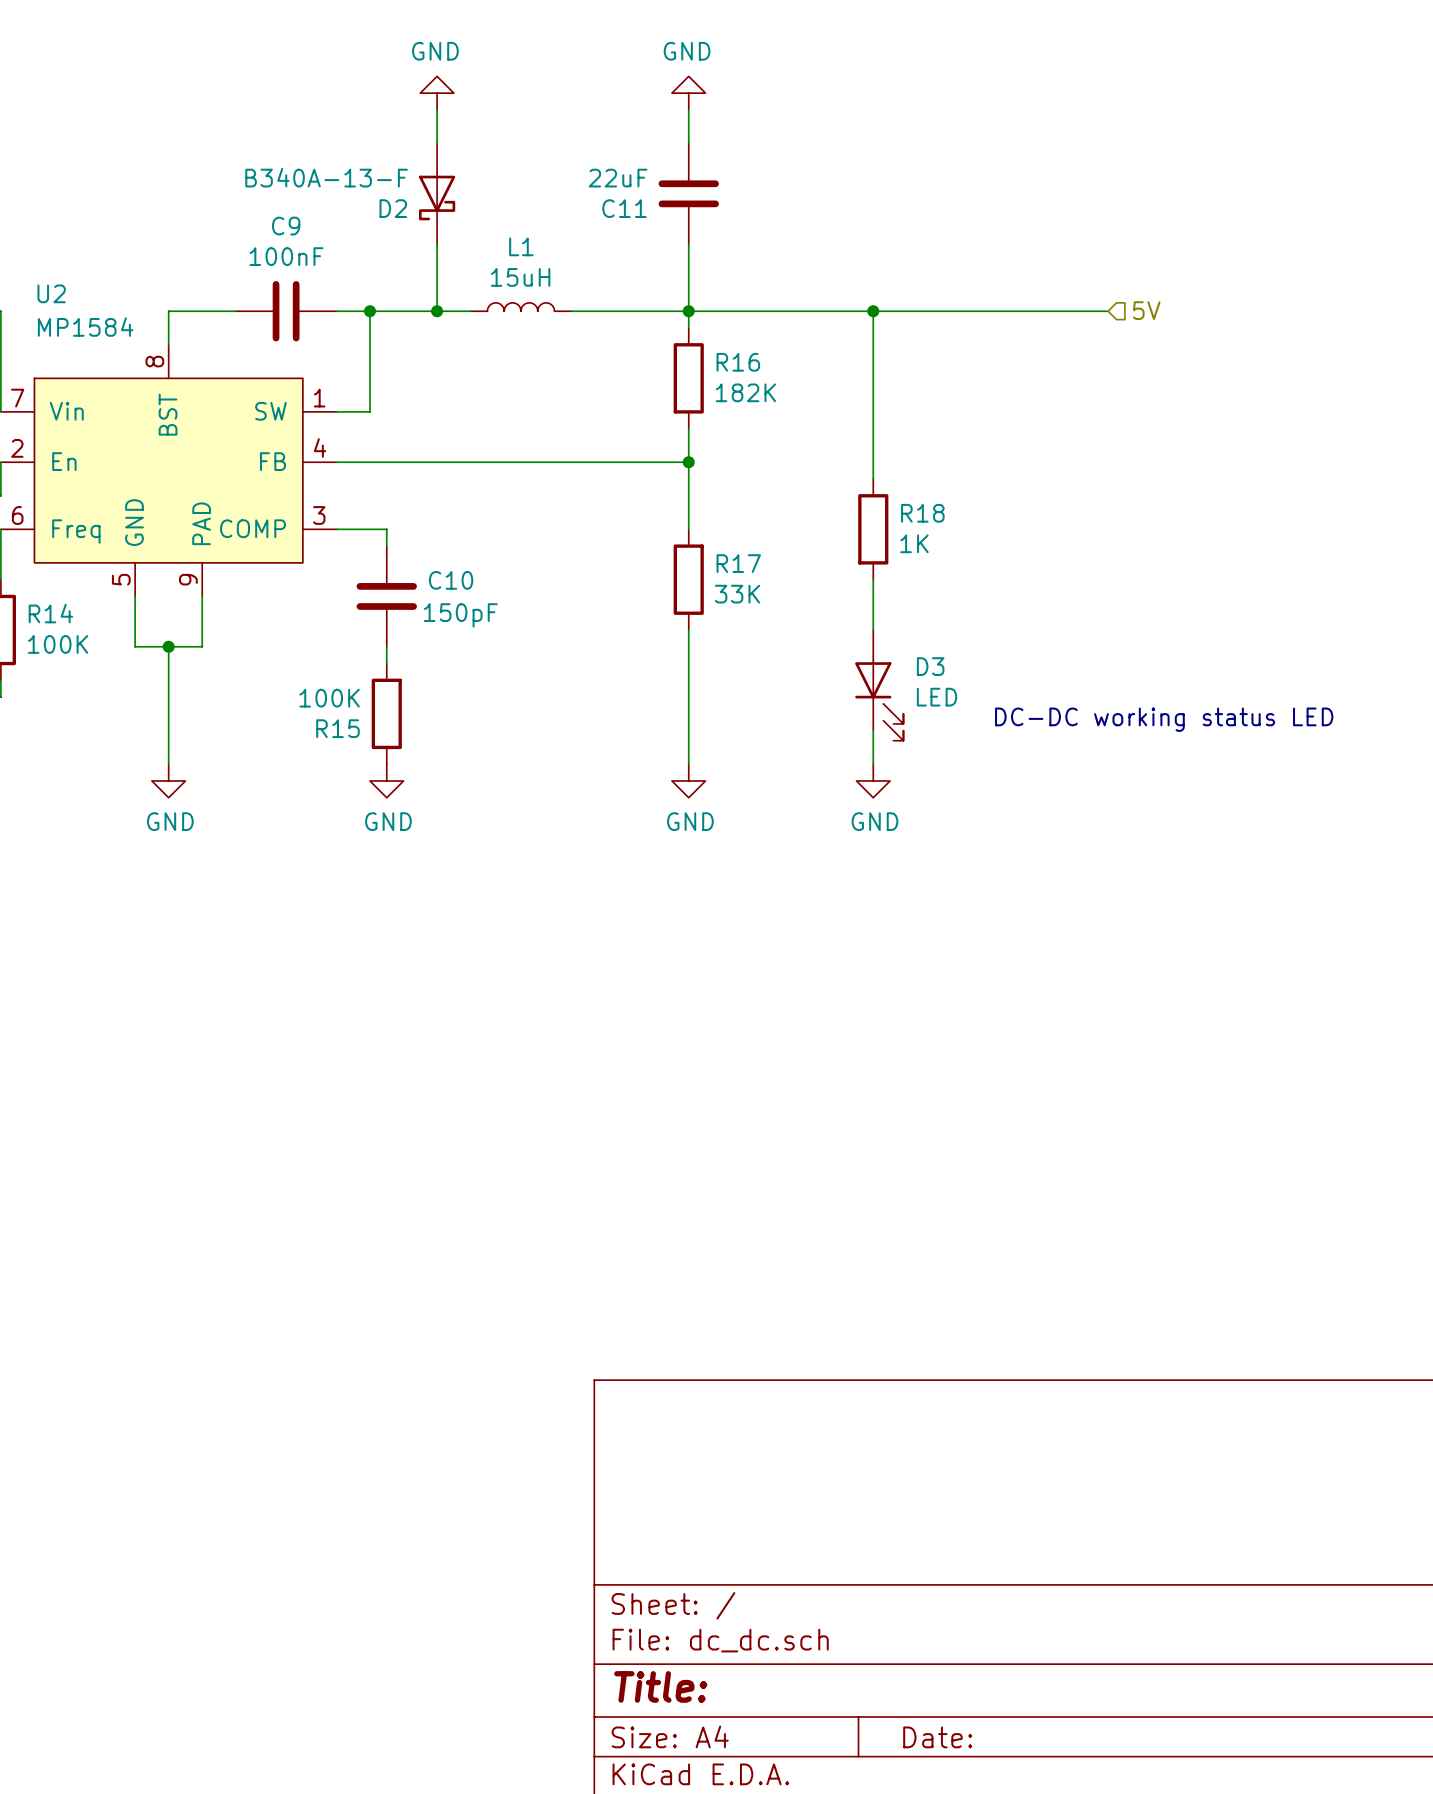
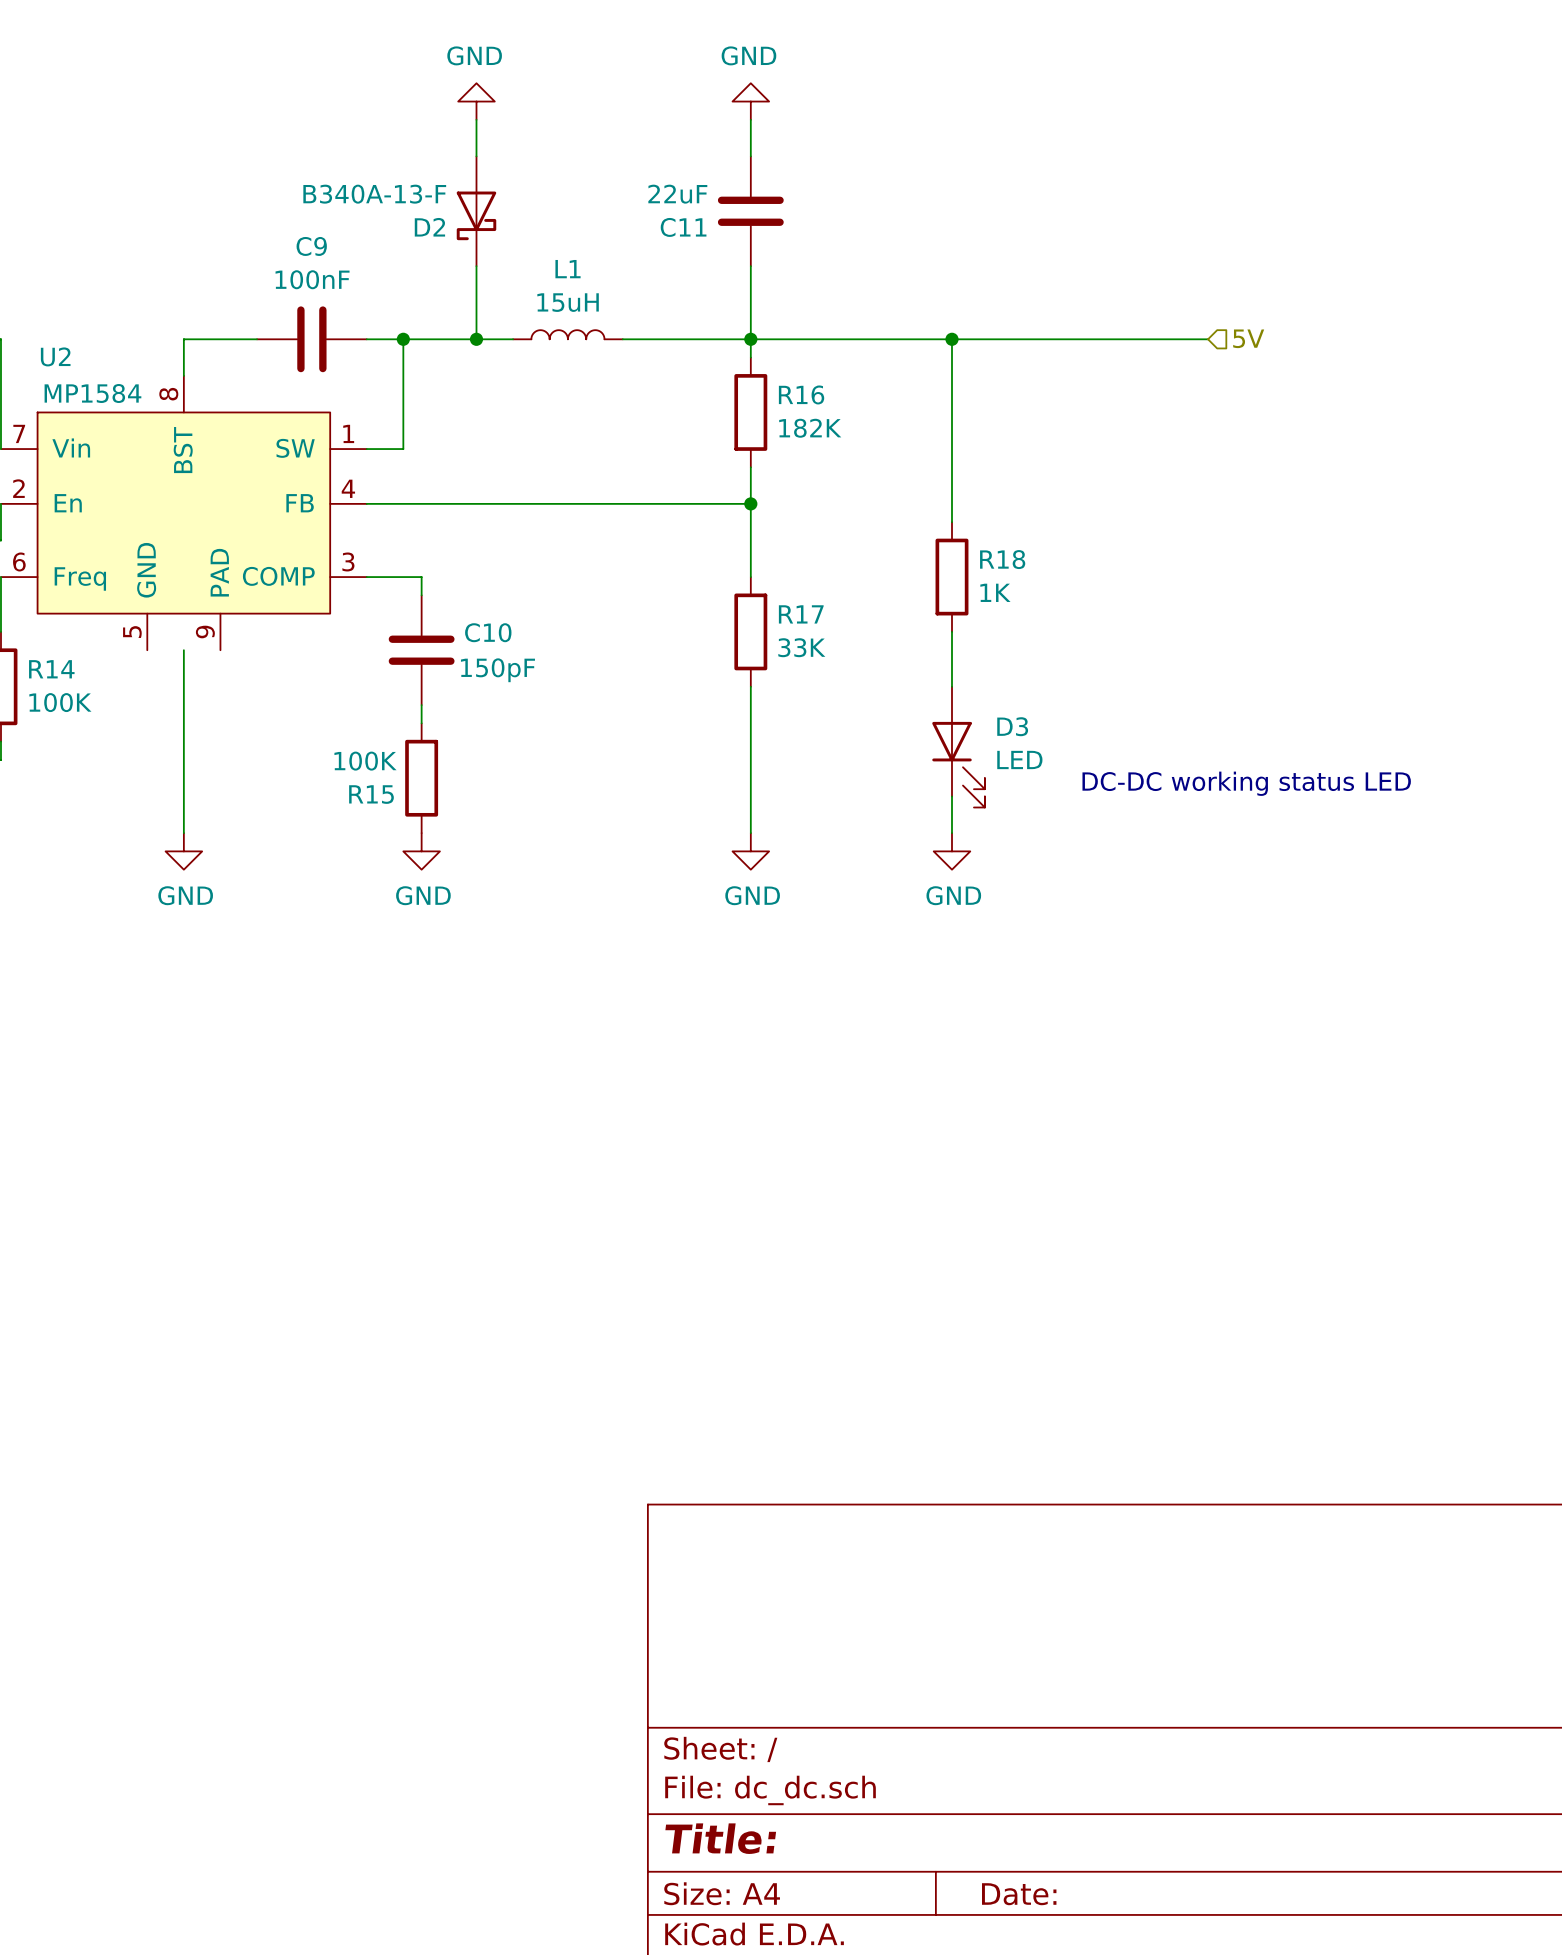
U2 name position: U2 (51, 293) -> U2 (55, 356)
U2 value position: MP1584 (85, 326) -> MP1584 (92, 393)
wire: (135, 596) (135, 646) (202, 646) (202, 596) -> none
wire: none -> (183, 650) (183, 705)
junction: (168, 646) -> none

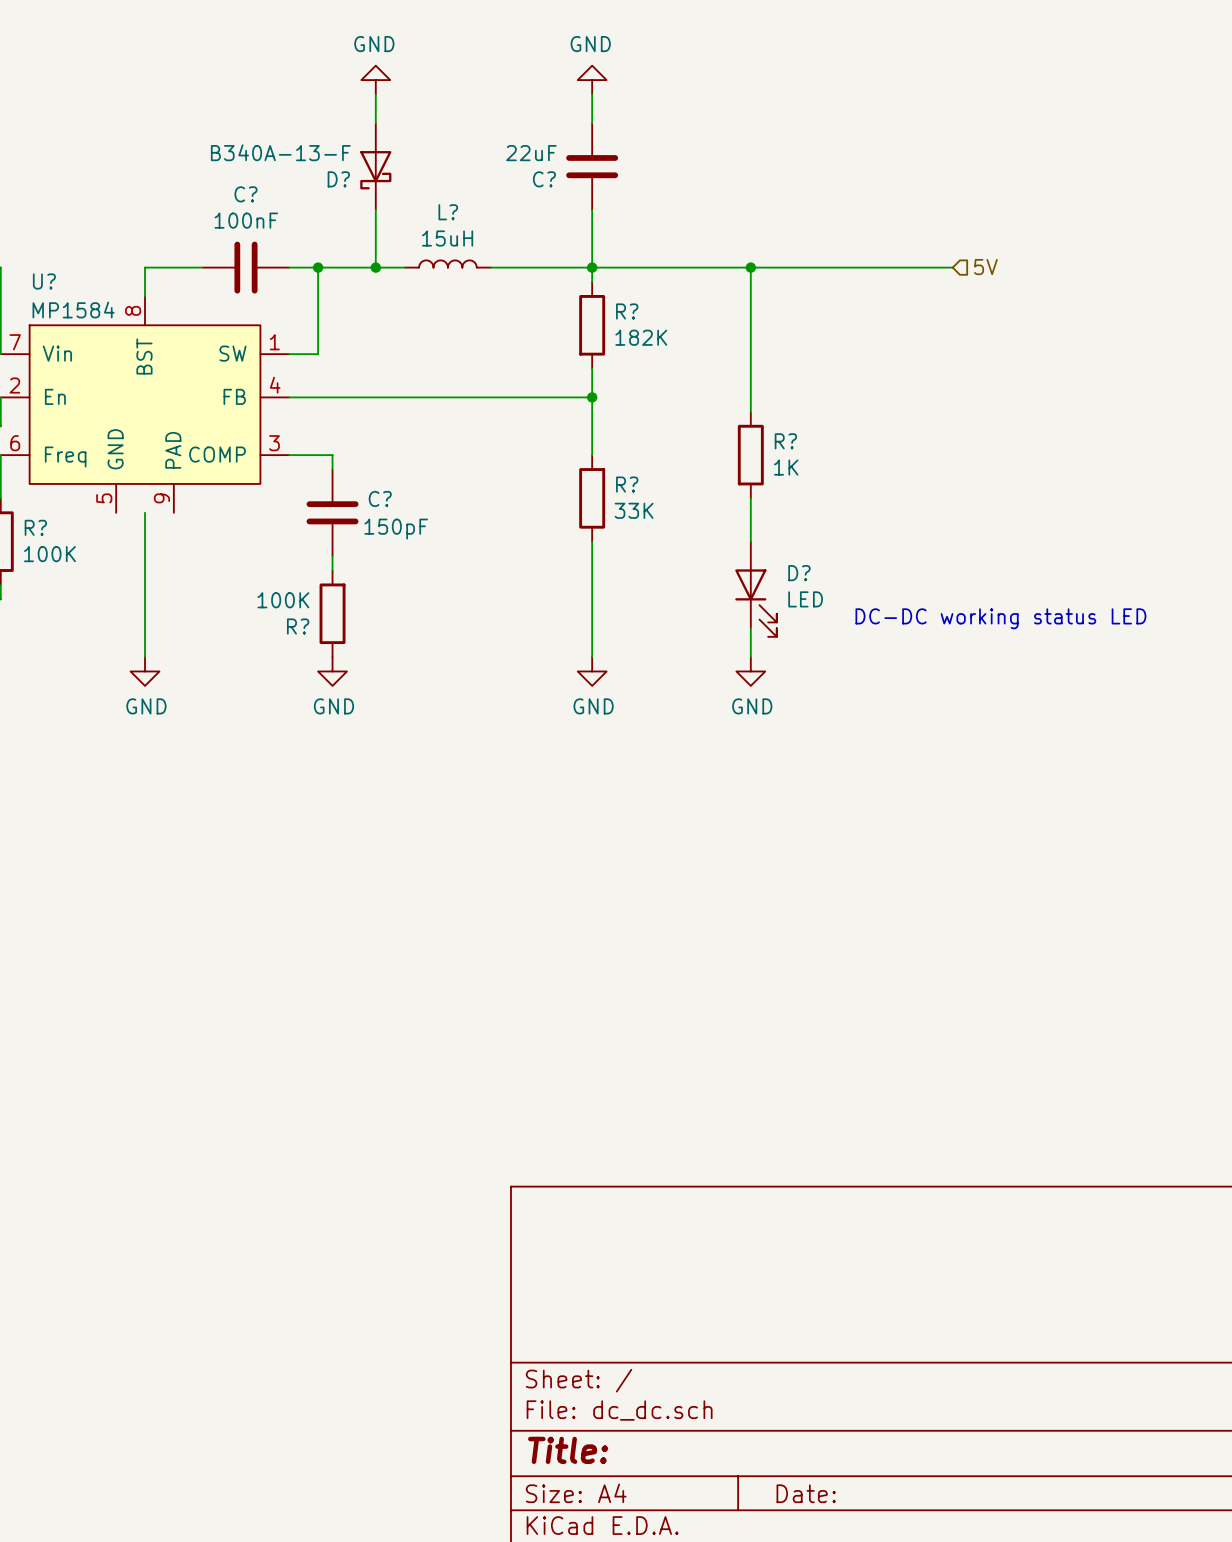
D2 name: D2 (429, 227) -> D? (338, 179)
C11 name: C11 (683, 227) -> C? (544, 179)
C9 name: C9 (311, 246) -> C? (245, 194)
L1 name: L1 (568, 269) -> L? (448, 212)
U2 name: U2 (55, 356) -> U? (44, 281)
R16 name: R16 (801, 394) -> R? (627, 311)
R18 name: R18 (1002, 559) -> R? (785, 441)
R17 name: R17 (801, 614) -> R? (627, 484)
C10 name: C10 (488, 632) -> C? (380, 498)
R14 name: R14 (51, 669) -> R? (35, 527)
D3 name: D3 (1012, 726) -> D? (799, 573)
R15 name: R15 (371, 794) -> R? (298, 626)

